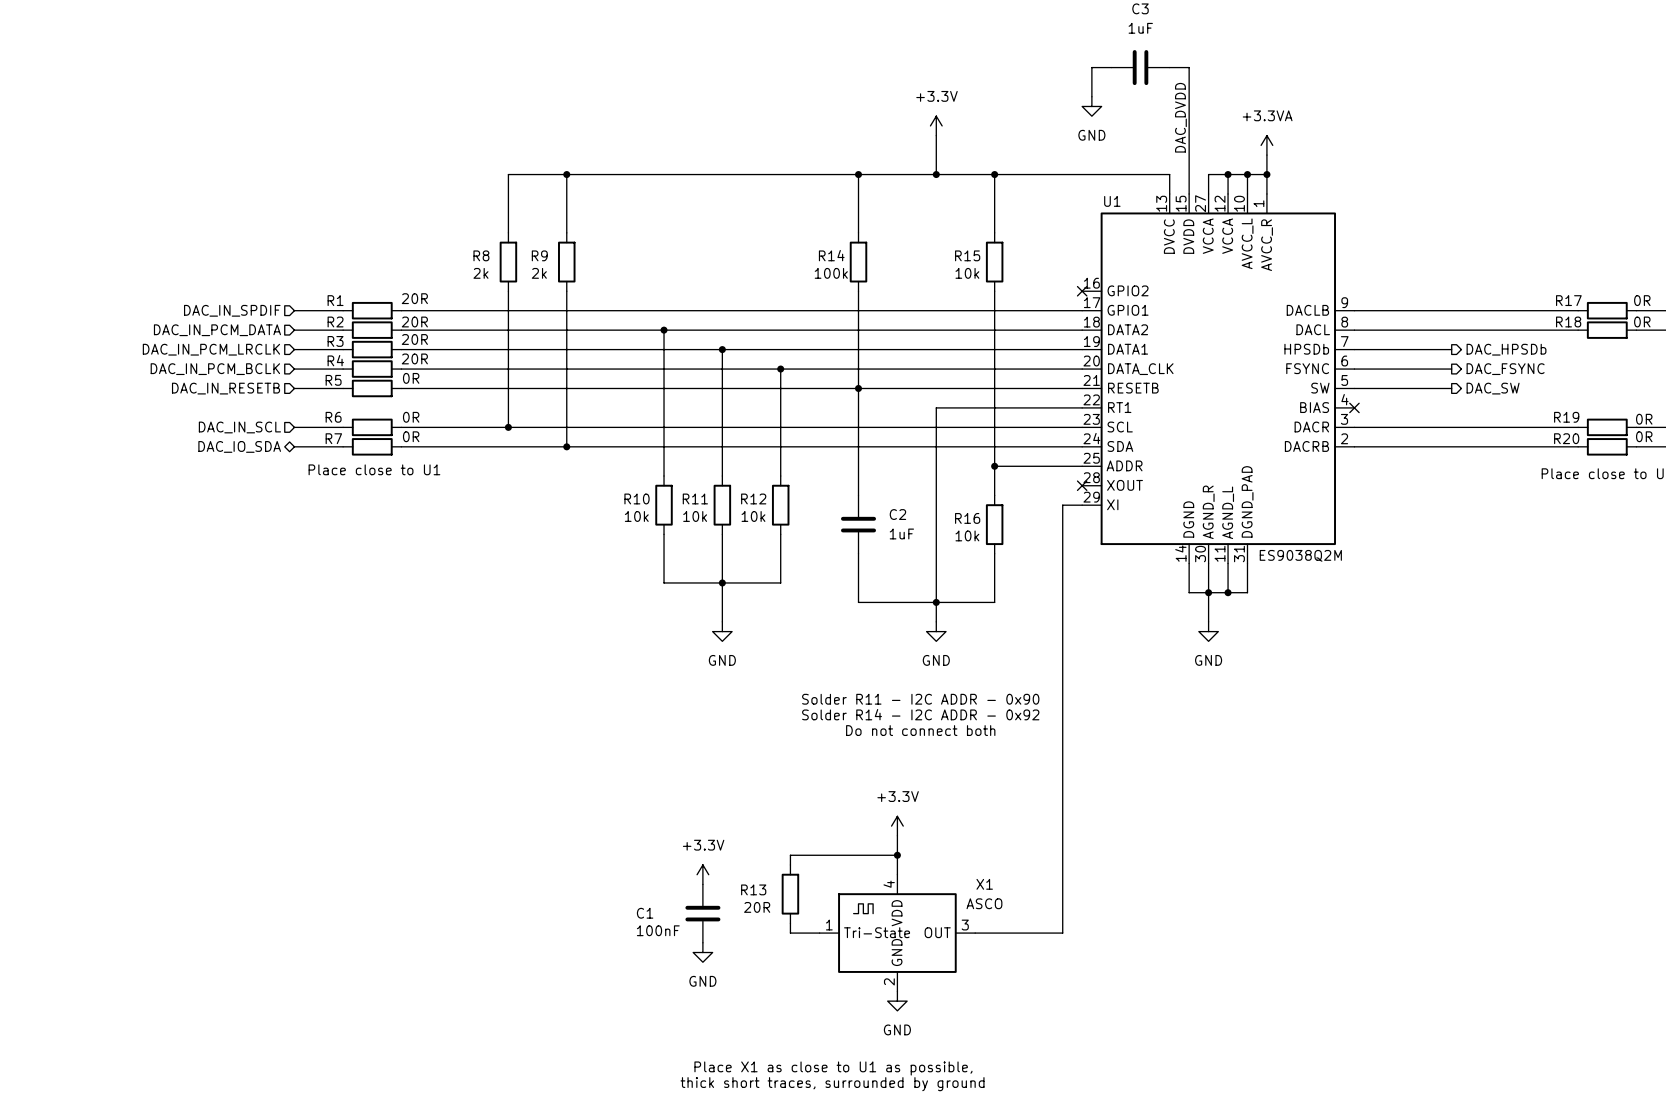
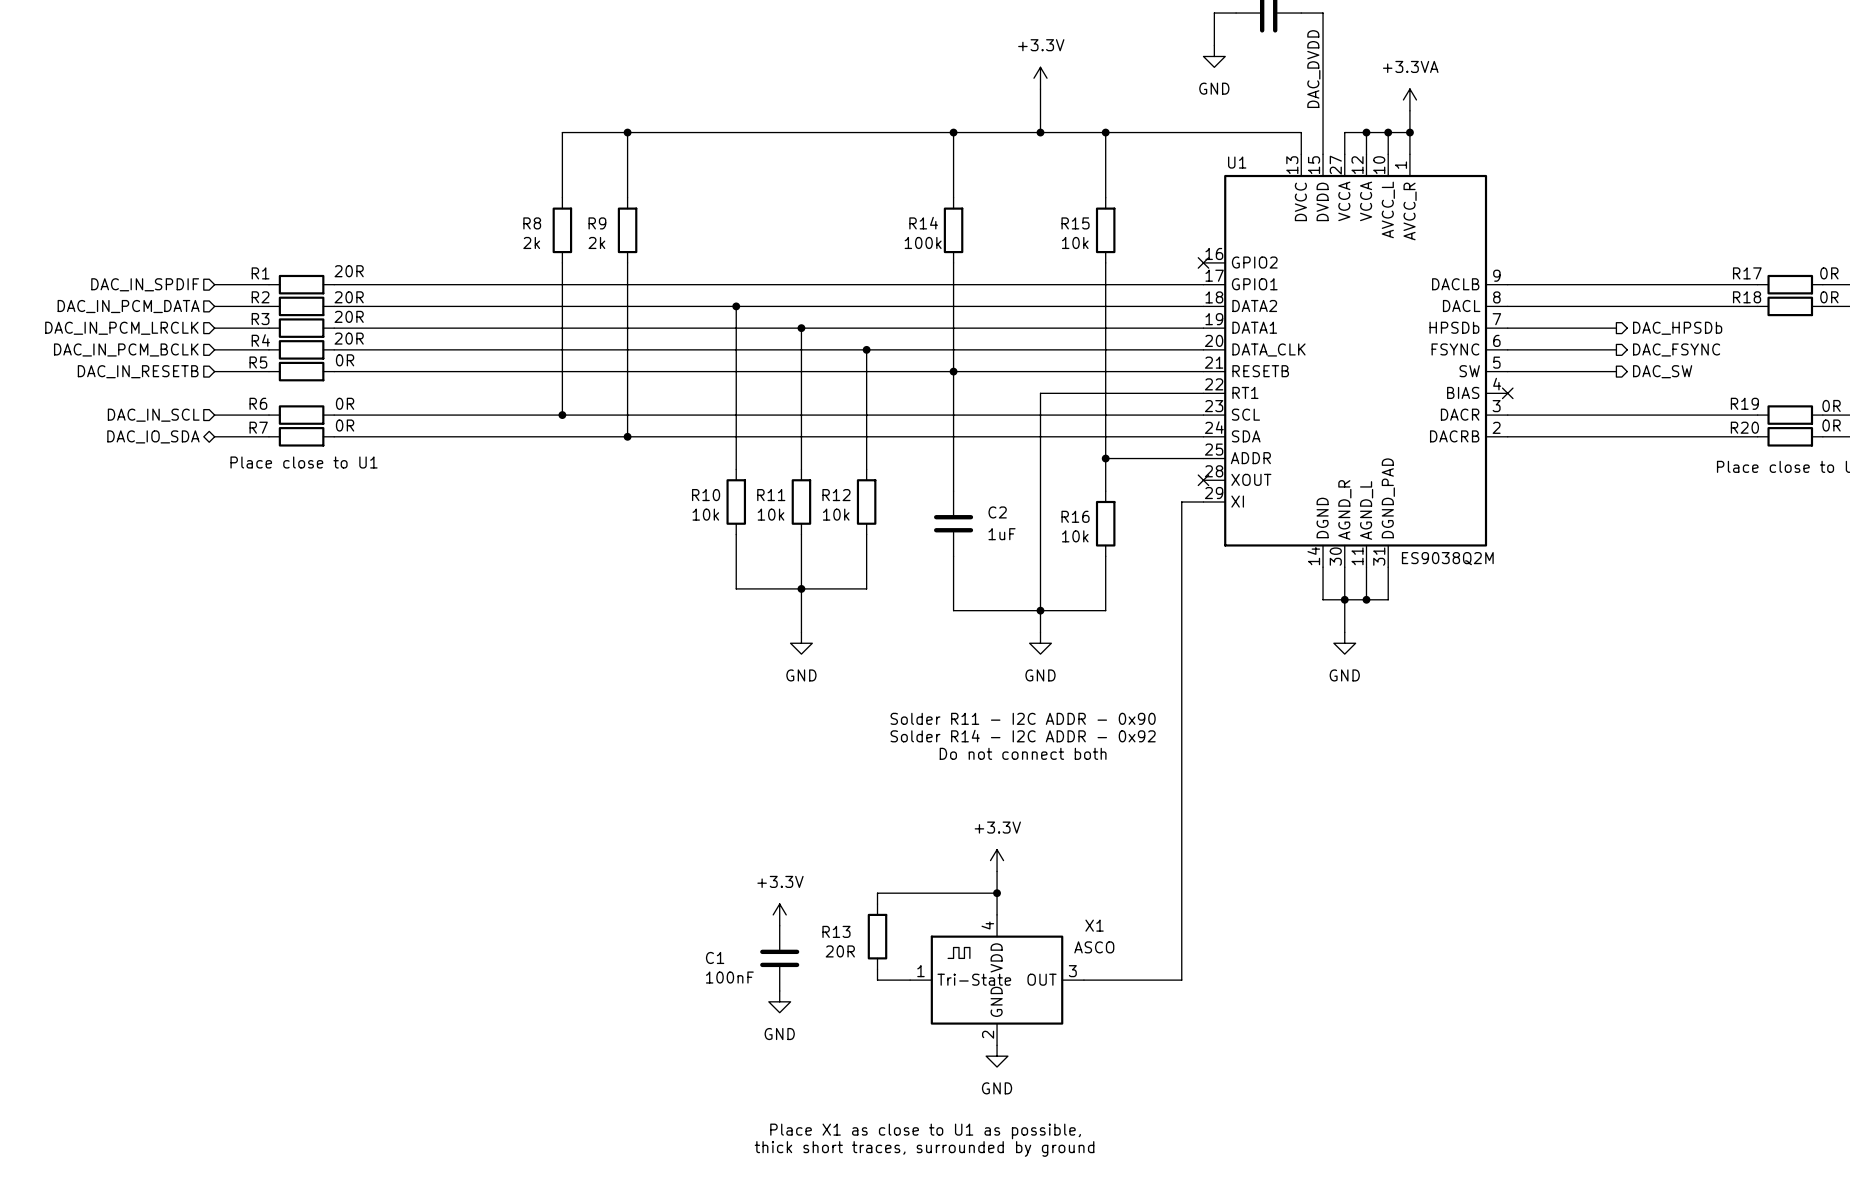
wire: none -> (214, 284) (268, 284)
hierarchical label position: DAC_IN_SPDIF (232, 310) -> DAC_IN_SPDIF (145, 284)
wire: none -> (377, 284) (442, 284)
R1 position: (372, 310) -> (301, 284)
wire: none -> (214, 306) (268, 306)
hierarchical label position: DAC_IN_PCM_DATA (217, 330) -> DAC_IN_PCM_DATA (128, 306)
wire: none -> (377, 306) (442, 306)
R2 position: (372, 330) -> (301, 306)
wire: none -> (214, 328) (268, 328)
hierarchical label position: DAC_IN_PCM_LRCLK (211, 349) -> DAC_IN_PCM_LRCLK (121, 328)
wire: none -> (377, 328) (442, 328)
R3 position: (372, 349) -> (301, 328)
wire: none -> (214, 349) (268, 349)
hierarchical label position: DAC_IN_PCM_BCLK (215, 369) -> DAC_IN_PCM_BCLK (126, 349)
wire: none -> (377, 349) (442, 349)
R4 position: (372, 369) -> (301, 349)
wire: none -> (214, 371) (268, 371)
hierarchical label position: DAC_IN_RESETB (226, 388) -> DAC_IN_RESETB (138, 371)
wire: none -> (377, 371) (442, 371)
R5 position: (372, 388) -> (301, 371)
wire: none -> (214, 415) (268, 415)
hierarchical label position: DAC_IN_SCL (239, 427) -> DAC_IN_SCL (153, 415)
wire: none -> (377, 415) (442, 415)
R6 position: (372, 427) -> (301, 415)
wire: none -> (214, 436) (268, 436)
hierarchical label position: DAC_IO_SDA (239, 446) -> DAC_IO_SDA (153, 436)
wire: none -> (377, 436) (442, 436)
R7 position: (372, 446) -> (301, 436)
text position: Place close to U1 (374, 469) -> Place close to U1 (304, 462)

